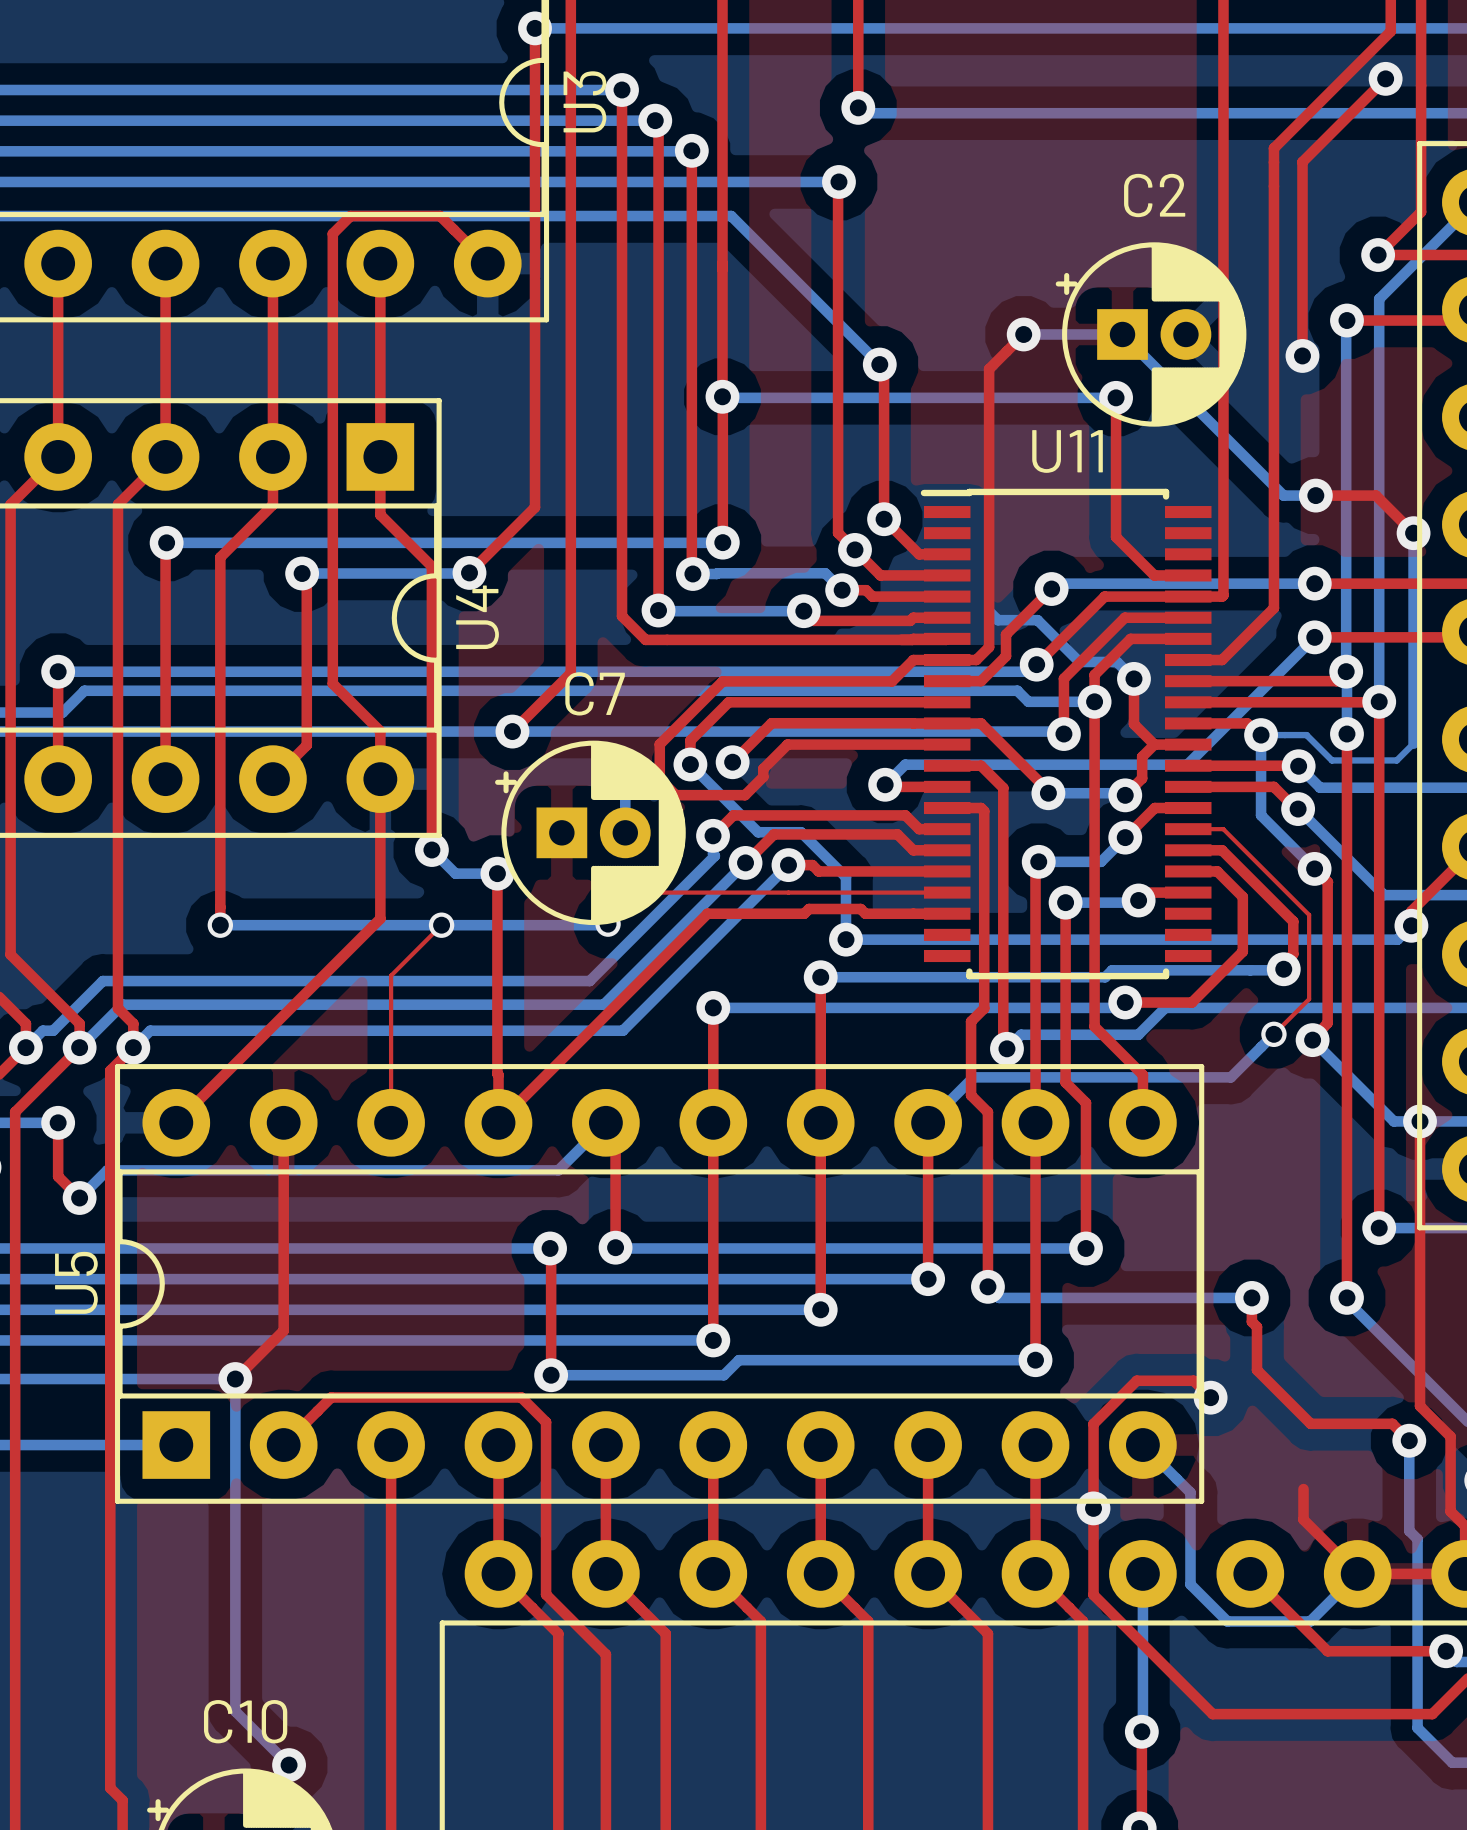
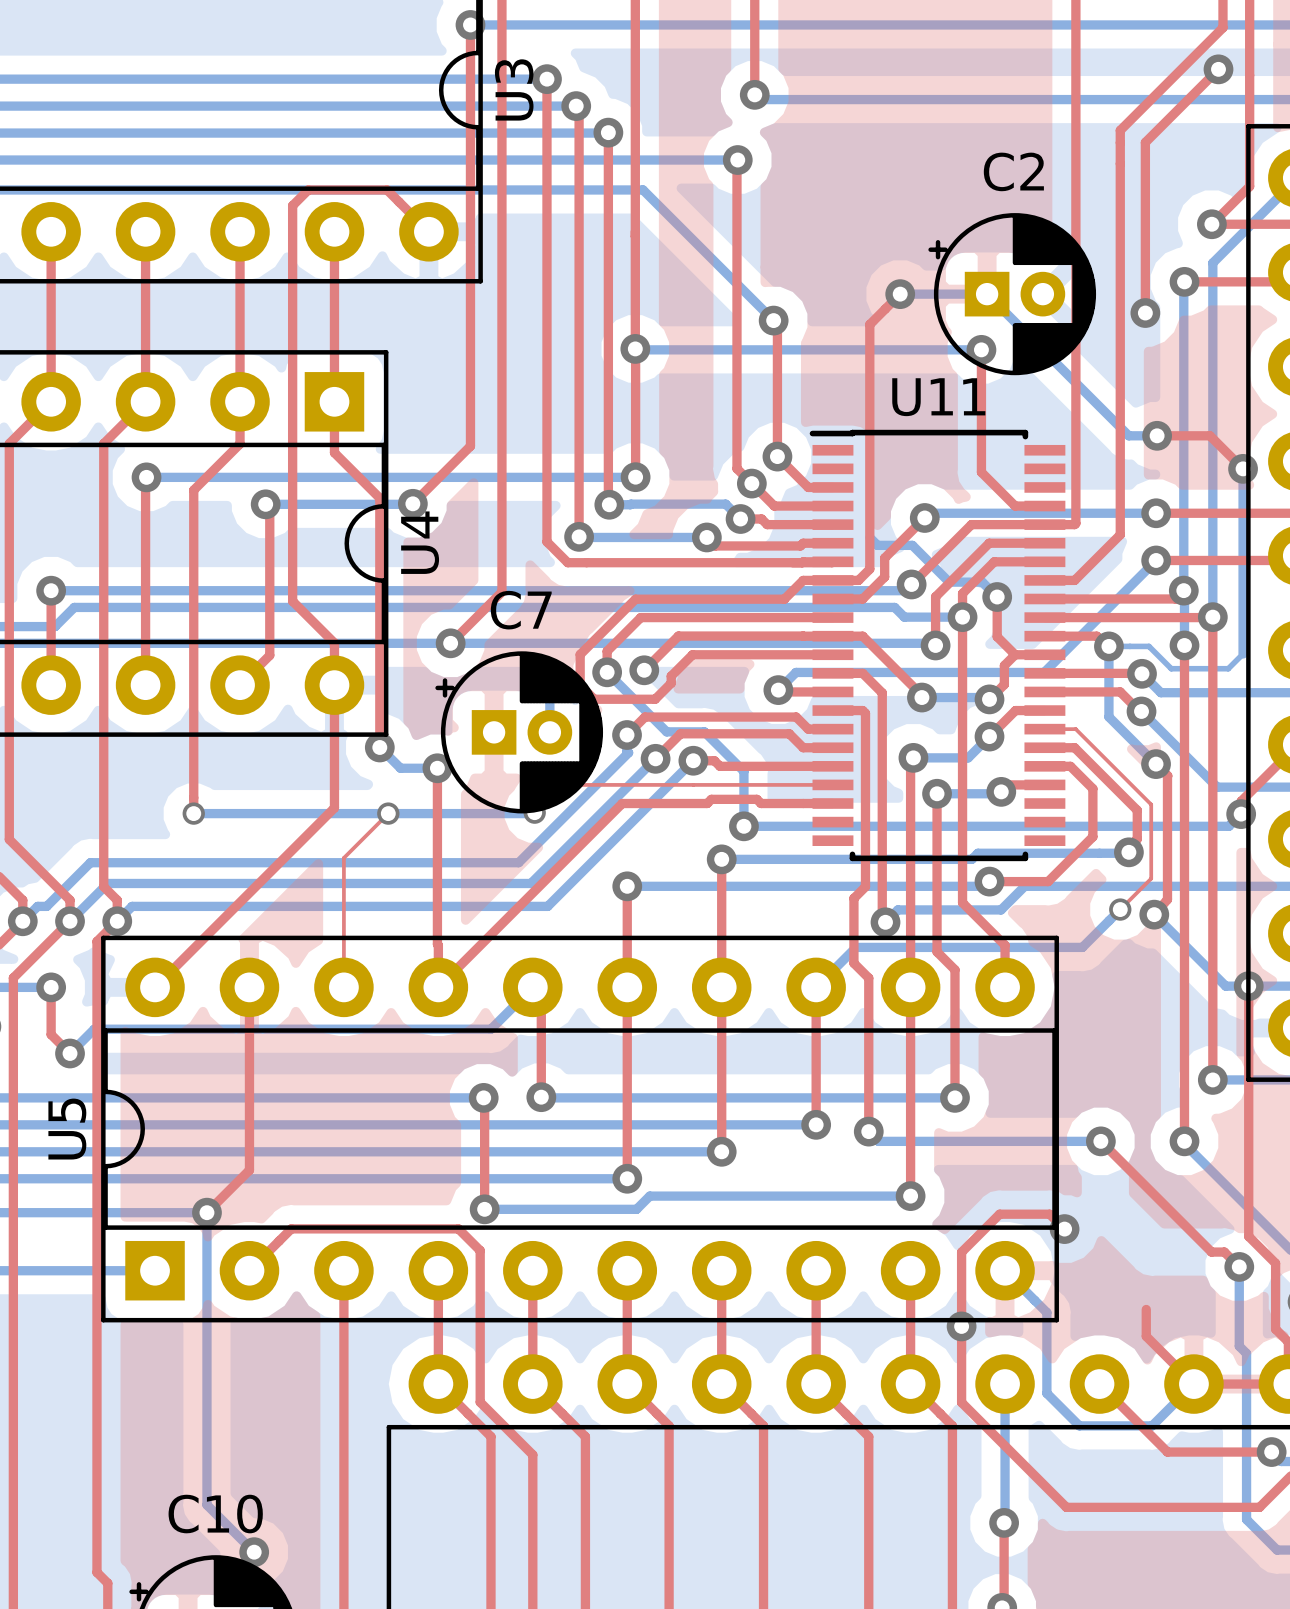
top track: (1251, 1297) (1251, 1321) (1257, 1326) (1257, 1370) (1310, 1423) (1377, 1423) -> (1100, 1141) (1211, 1252)

